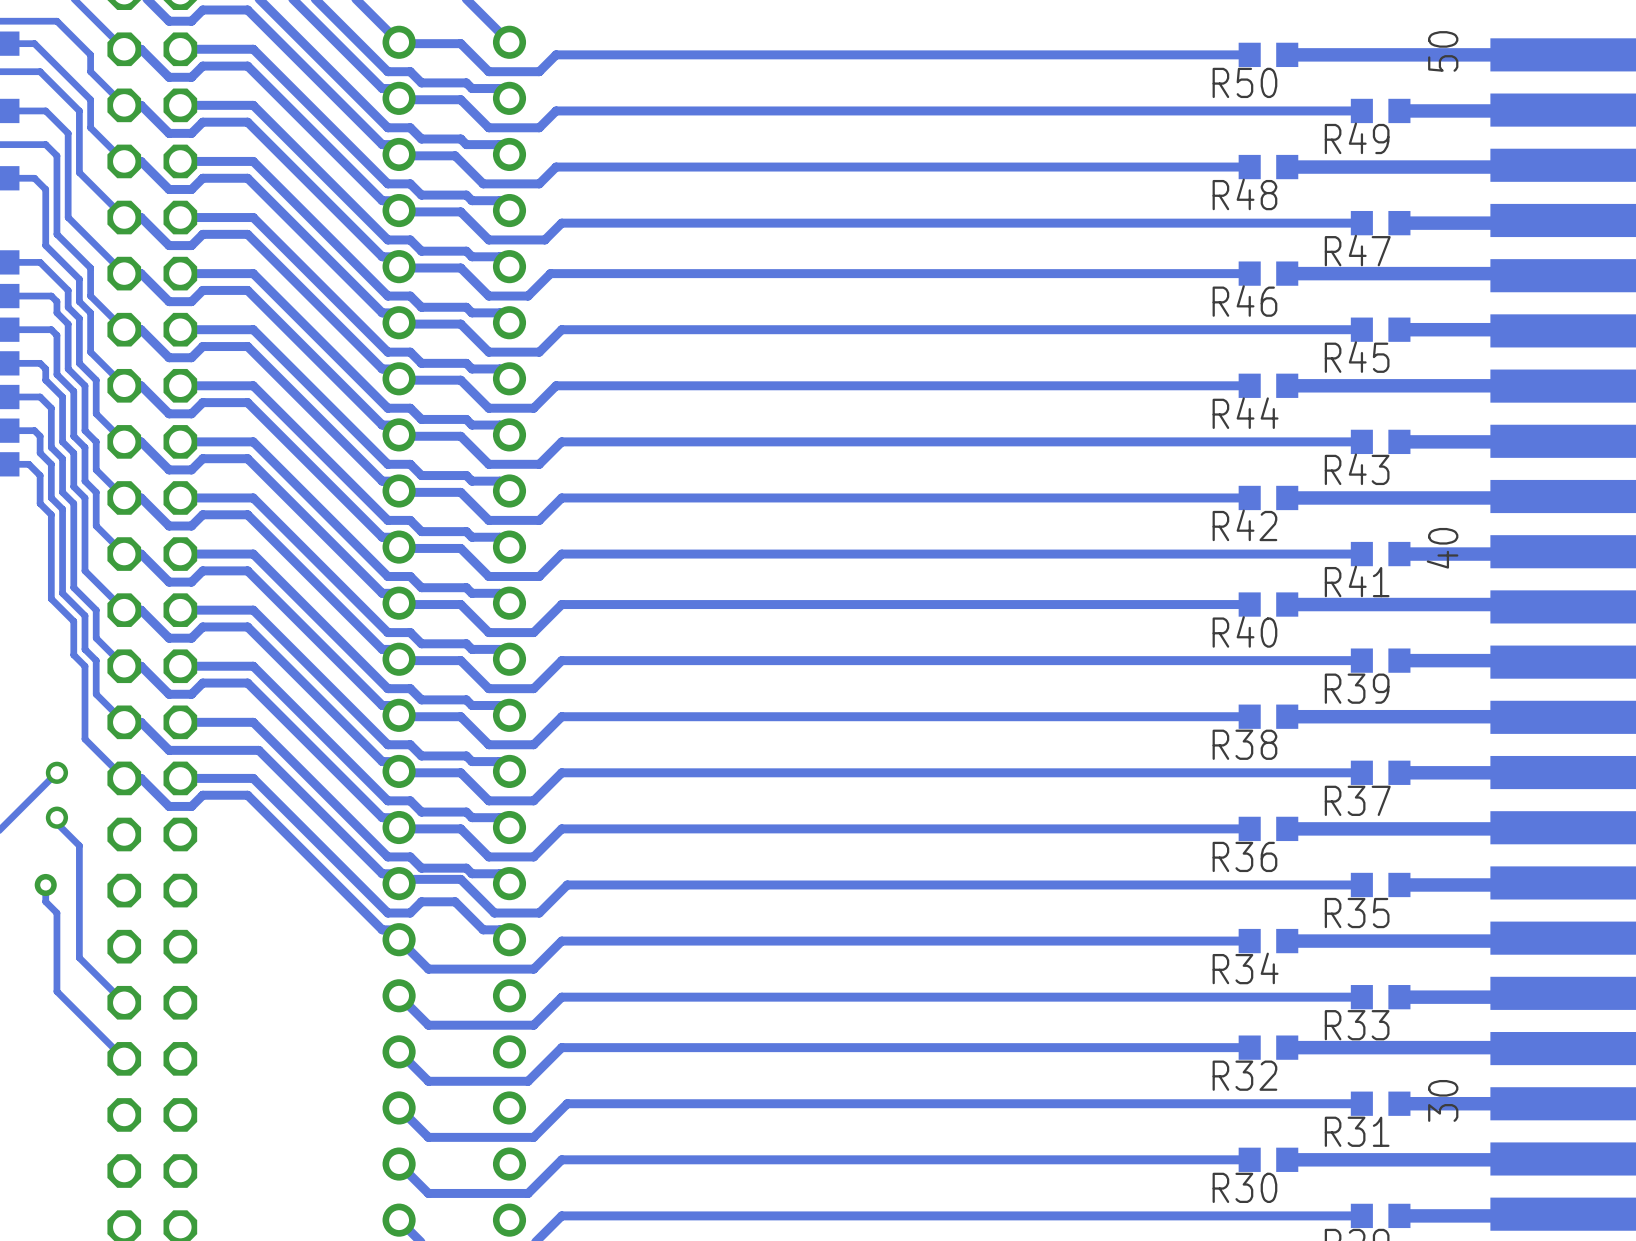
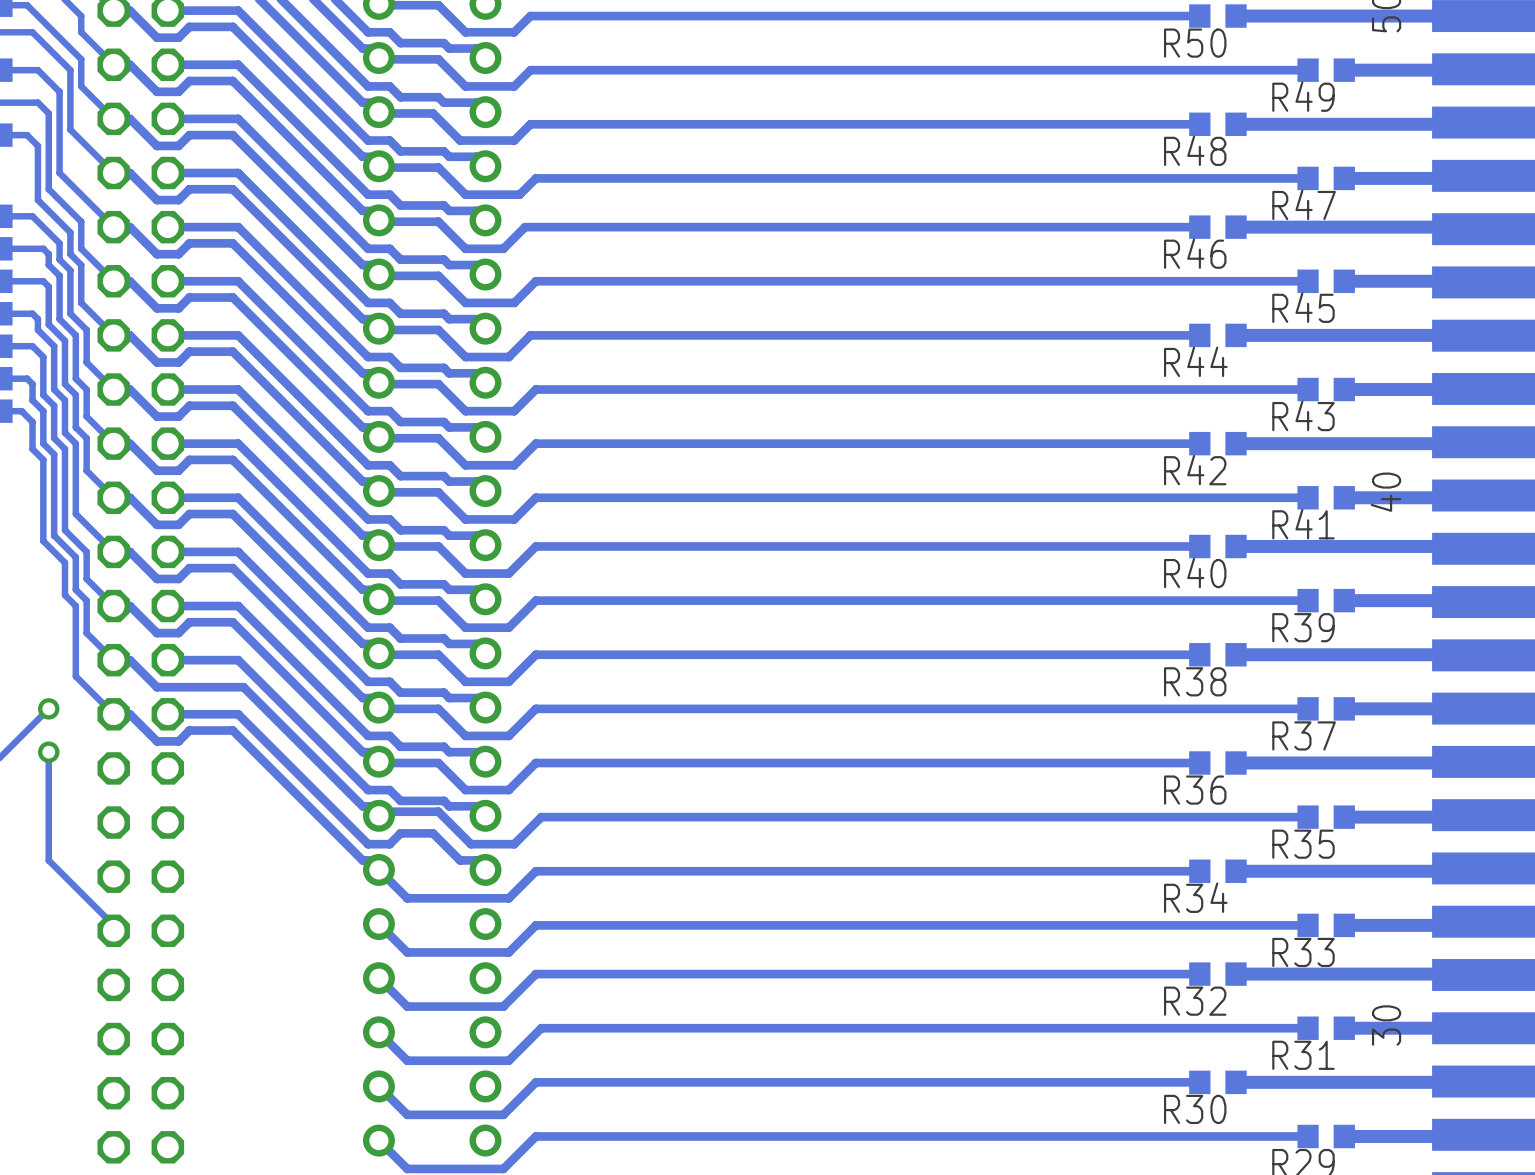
track: (56, 823) (79, 845) (79, 957) (124, 1002) -> none
track: (45, 884) (45, 901) (56, 913) -> (48, 757) (48, 844)
via: (45, 884) -> none
track: (56, 929) (56, 991) (124, 1058) -> (48, 860) (113, 925)

